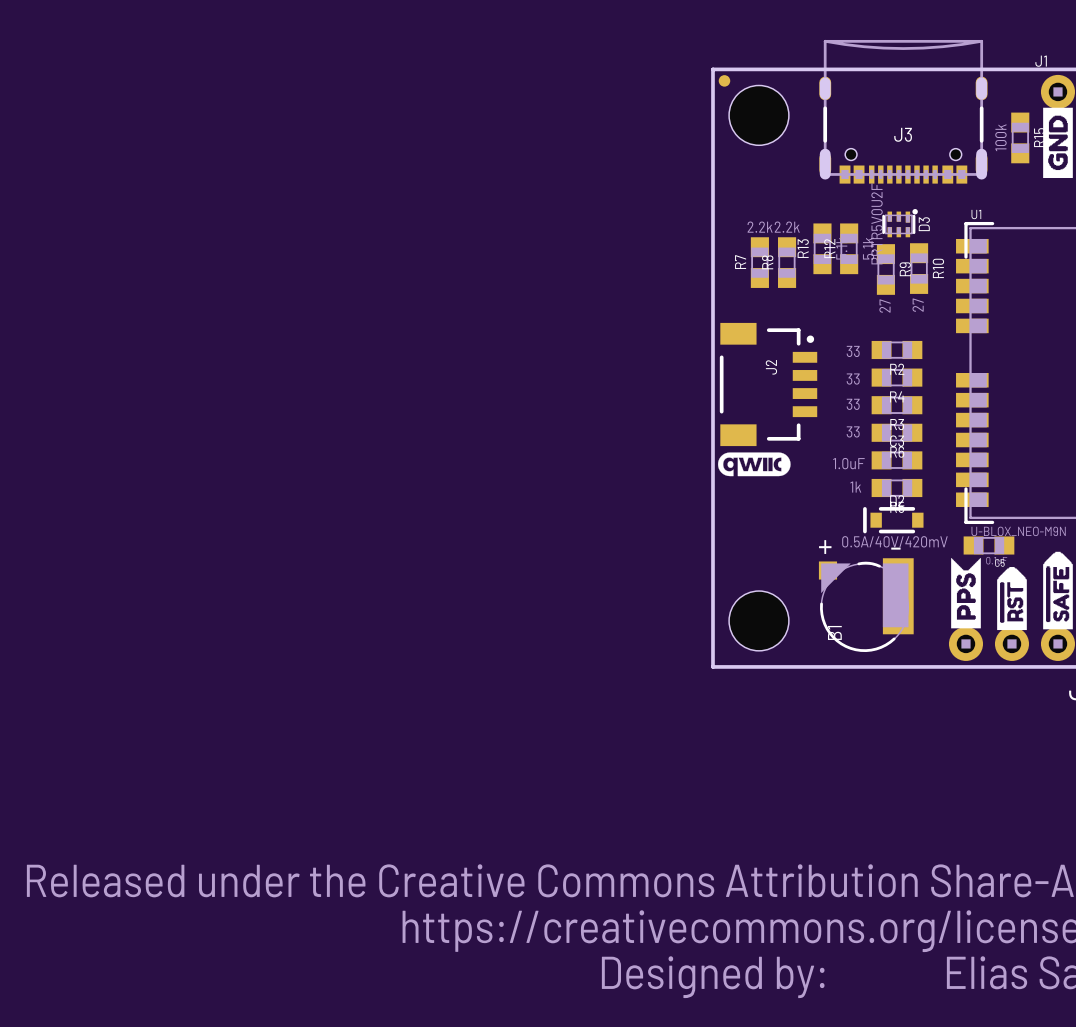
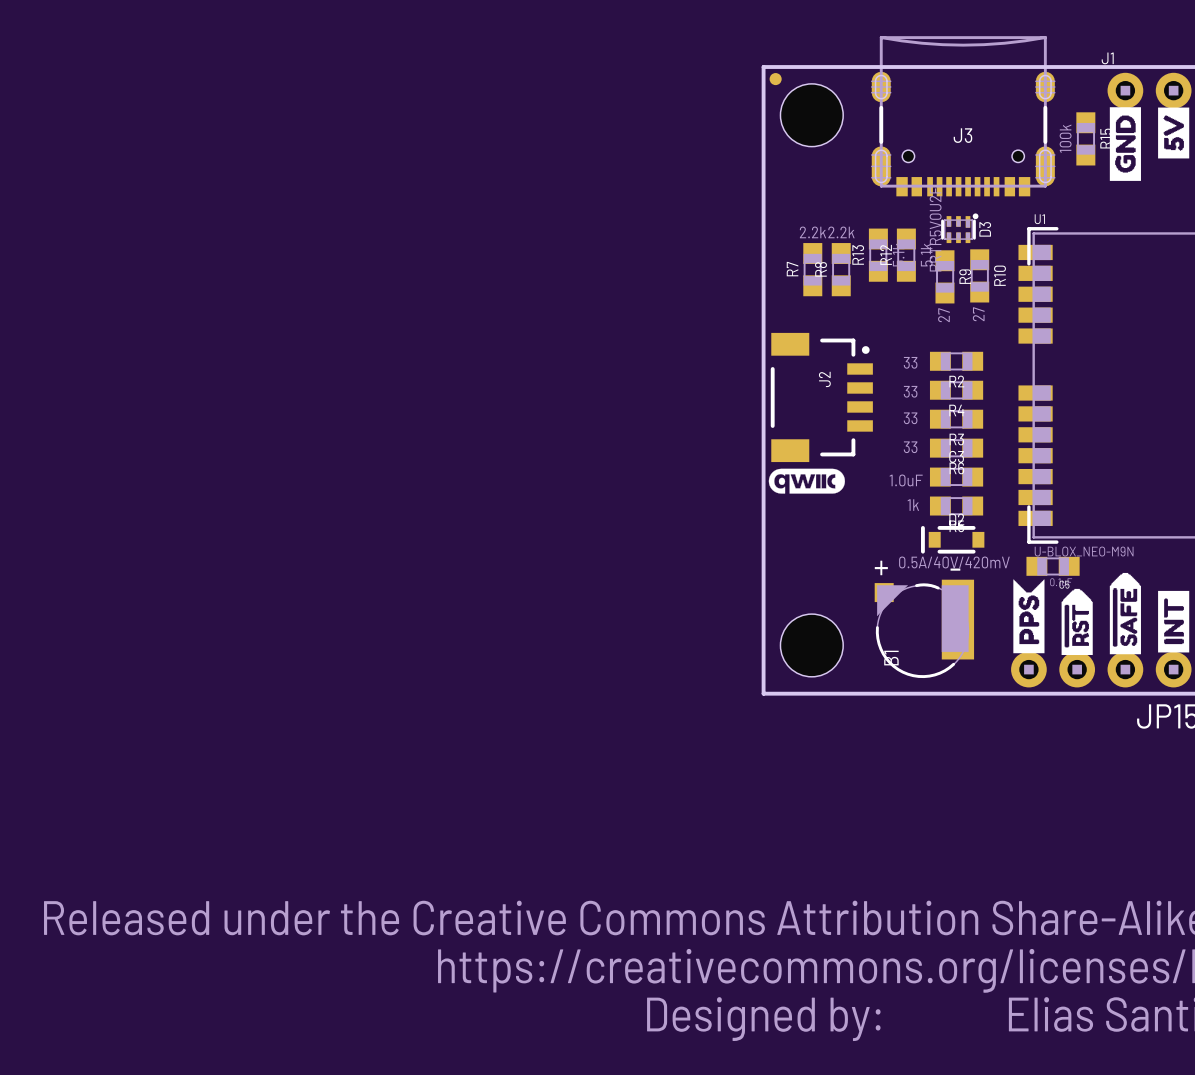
J3 footprint: [819, 39, 988, 184] -> [871, 36, 1055, 197]

